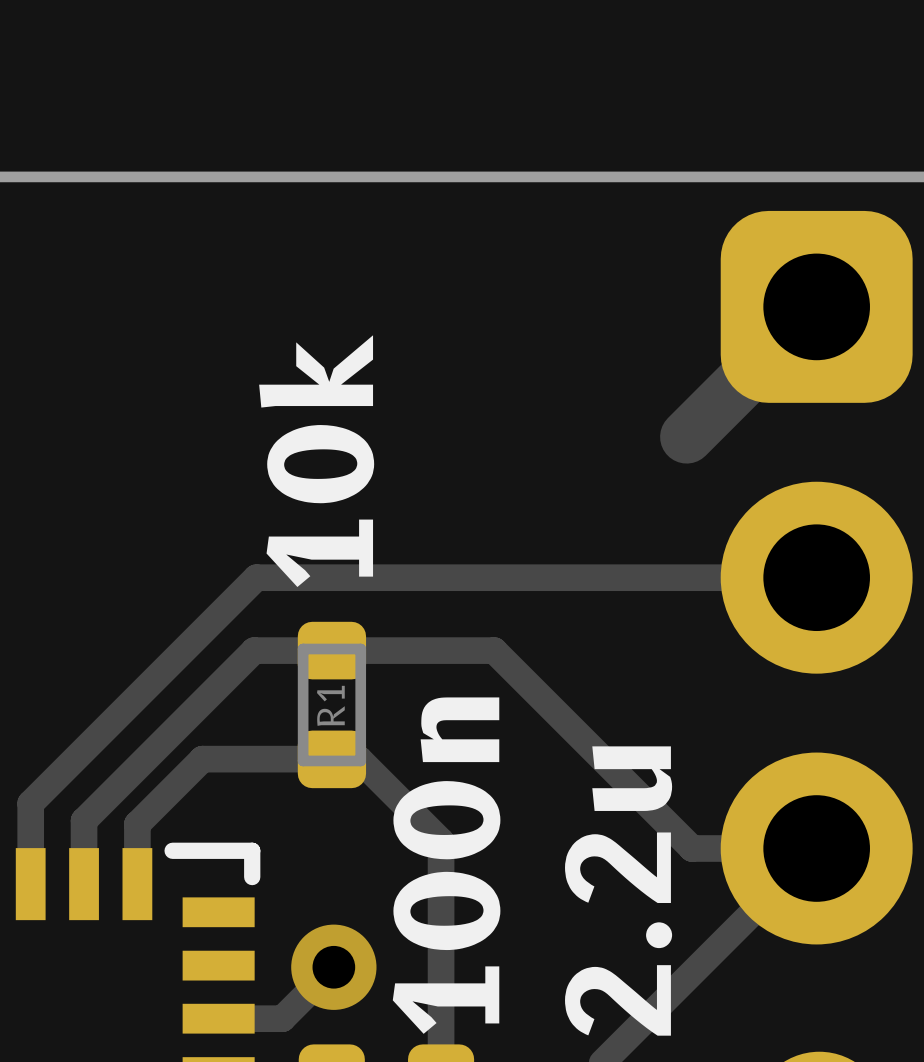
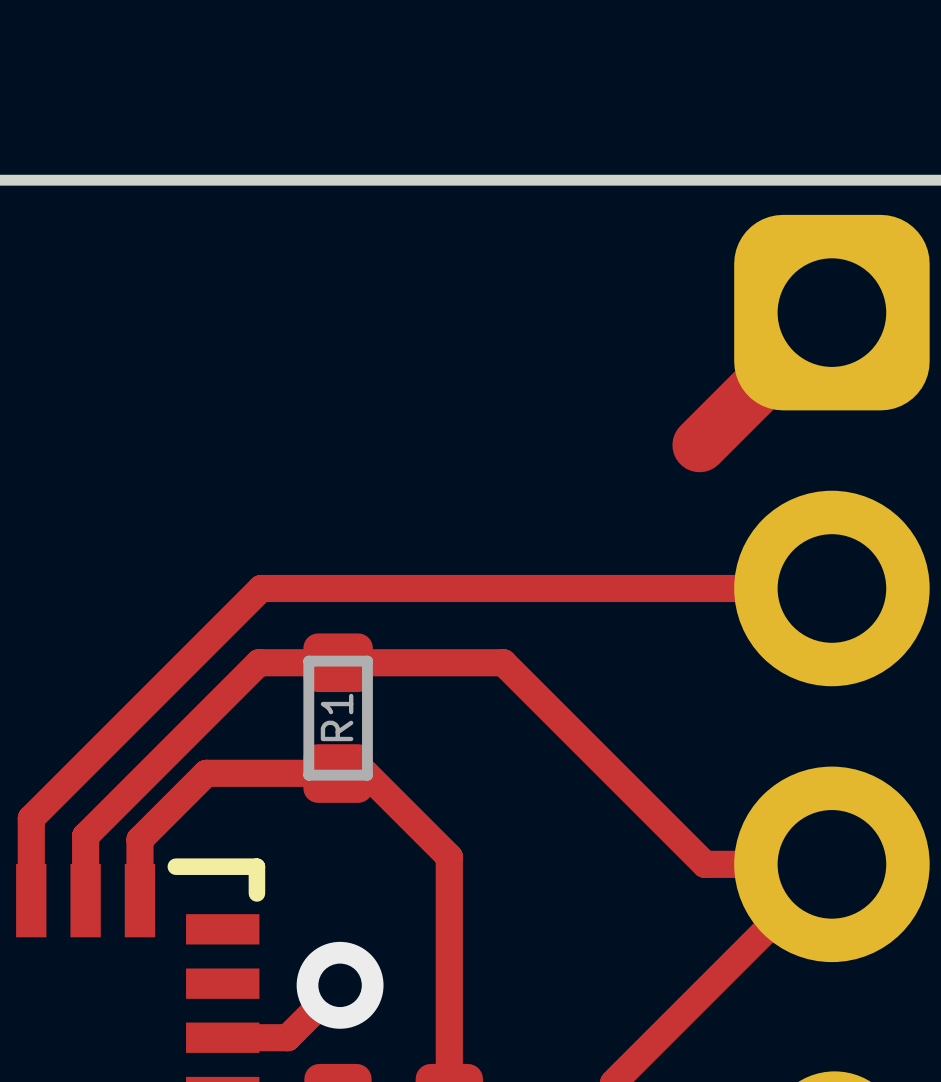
text: 10k (316, 461) -> none
text: 100n (446, 865) -> none
text: 2.2u (618, 891) -> none

